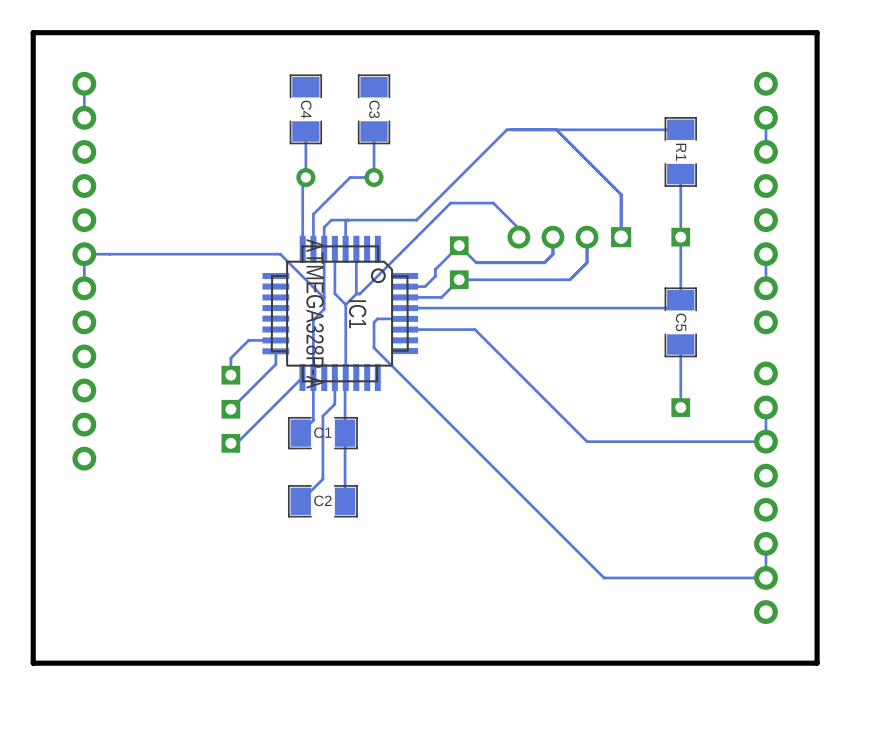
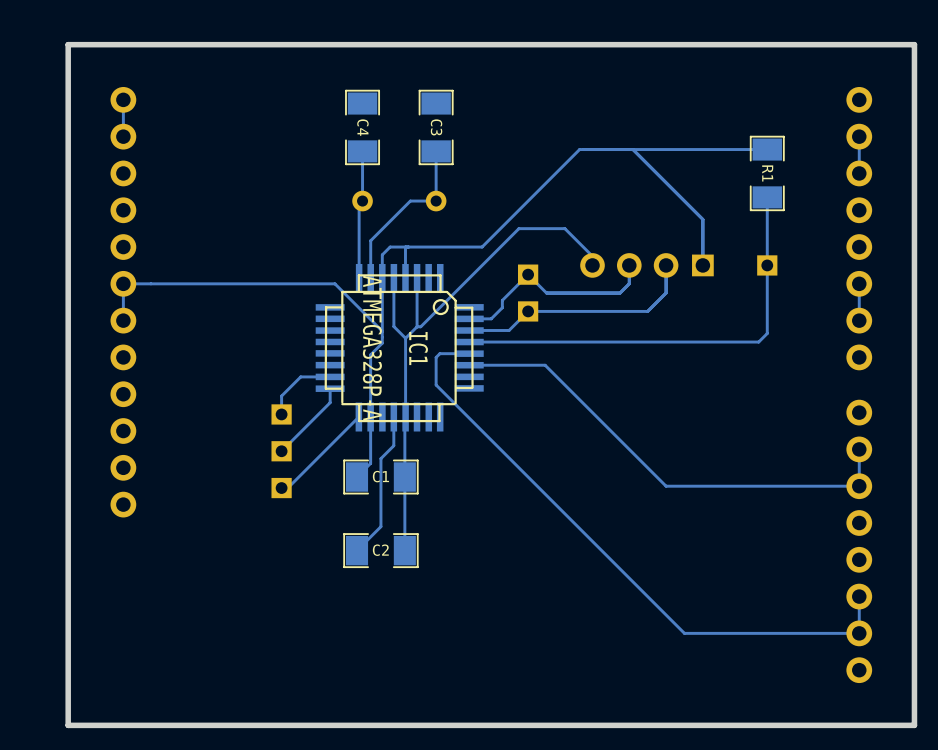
C5: (680, 322) -> none
track: (680, 344) (680, 407) -> none
part: (680, 407) -> none

